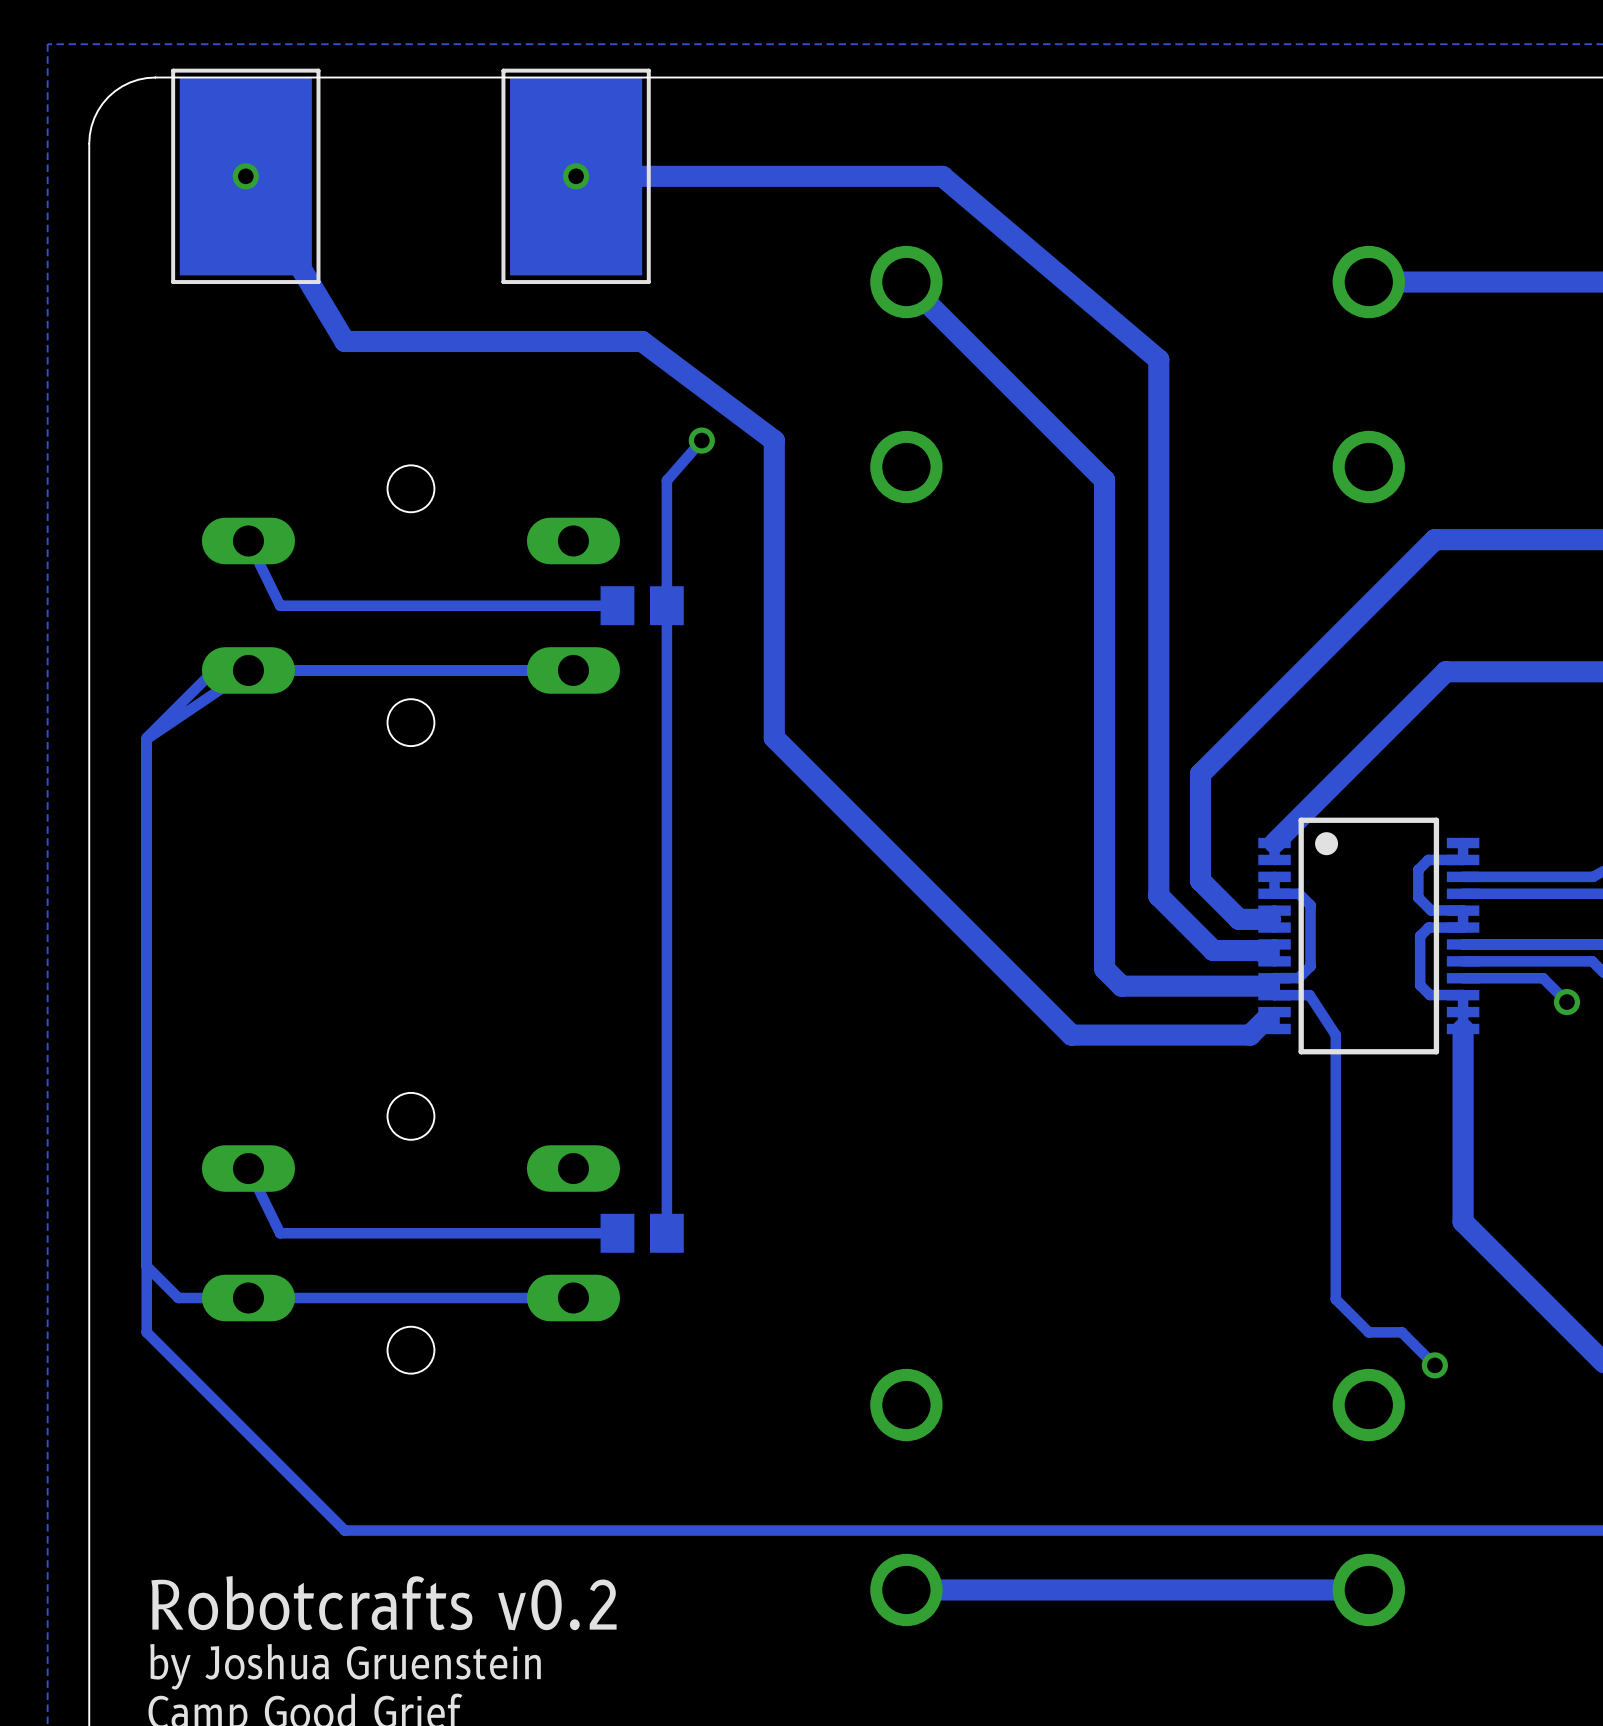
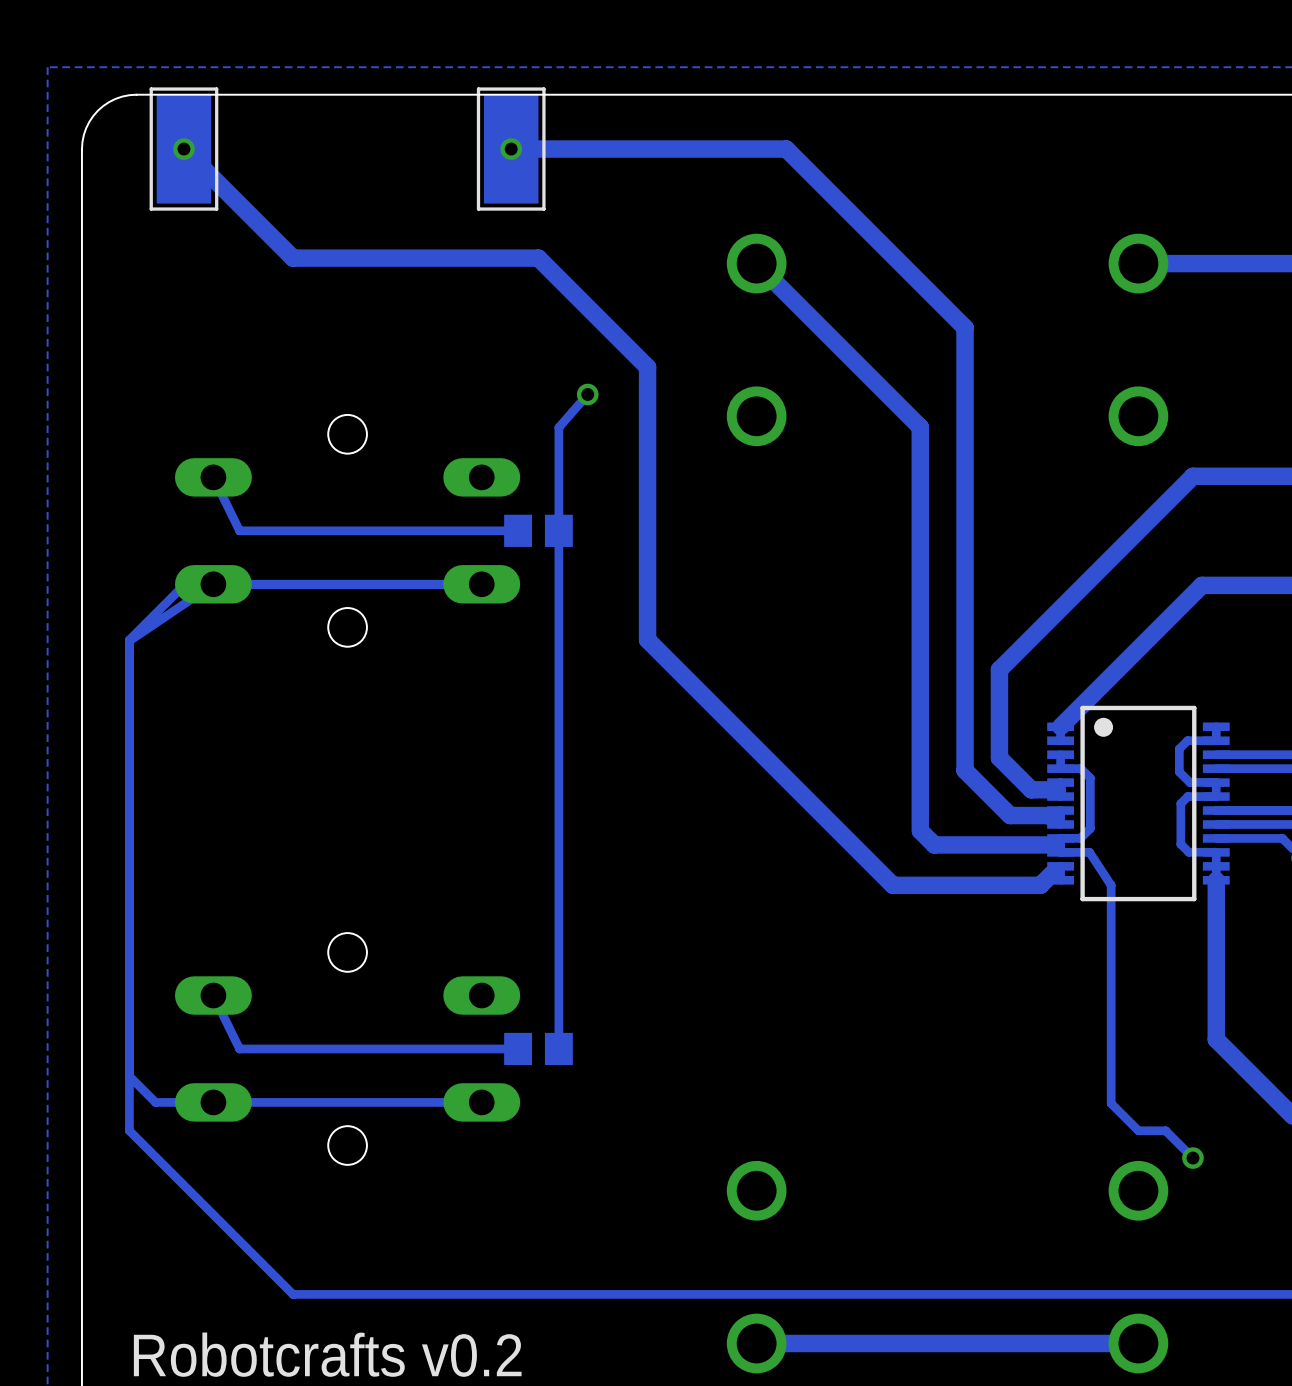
part: none -> (183, 149)
part: none -> (511, 149)
track: (245, 176) (344, 341) (642, 341) (774, 440) -> (183, 149) (293, 258) (538, 258) (647, 367) (647, 394)
part: (245, 176) -> none
via position: (245, 176) -> (183, 149)
track: (576, 176) (942, 176) (1158, 359) -> (511, 149) (786, 149) (965, 327)
part: (576, 176) -> none
via position: (576, 176) -> (511, 149)

